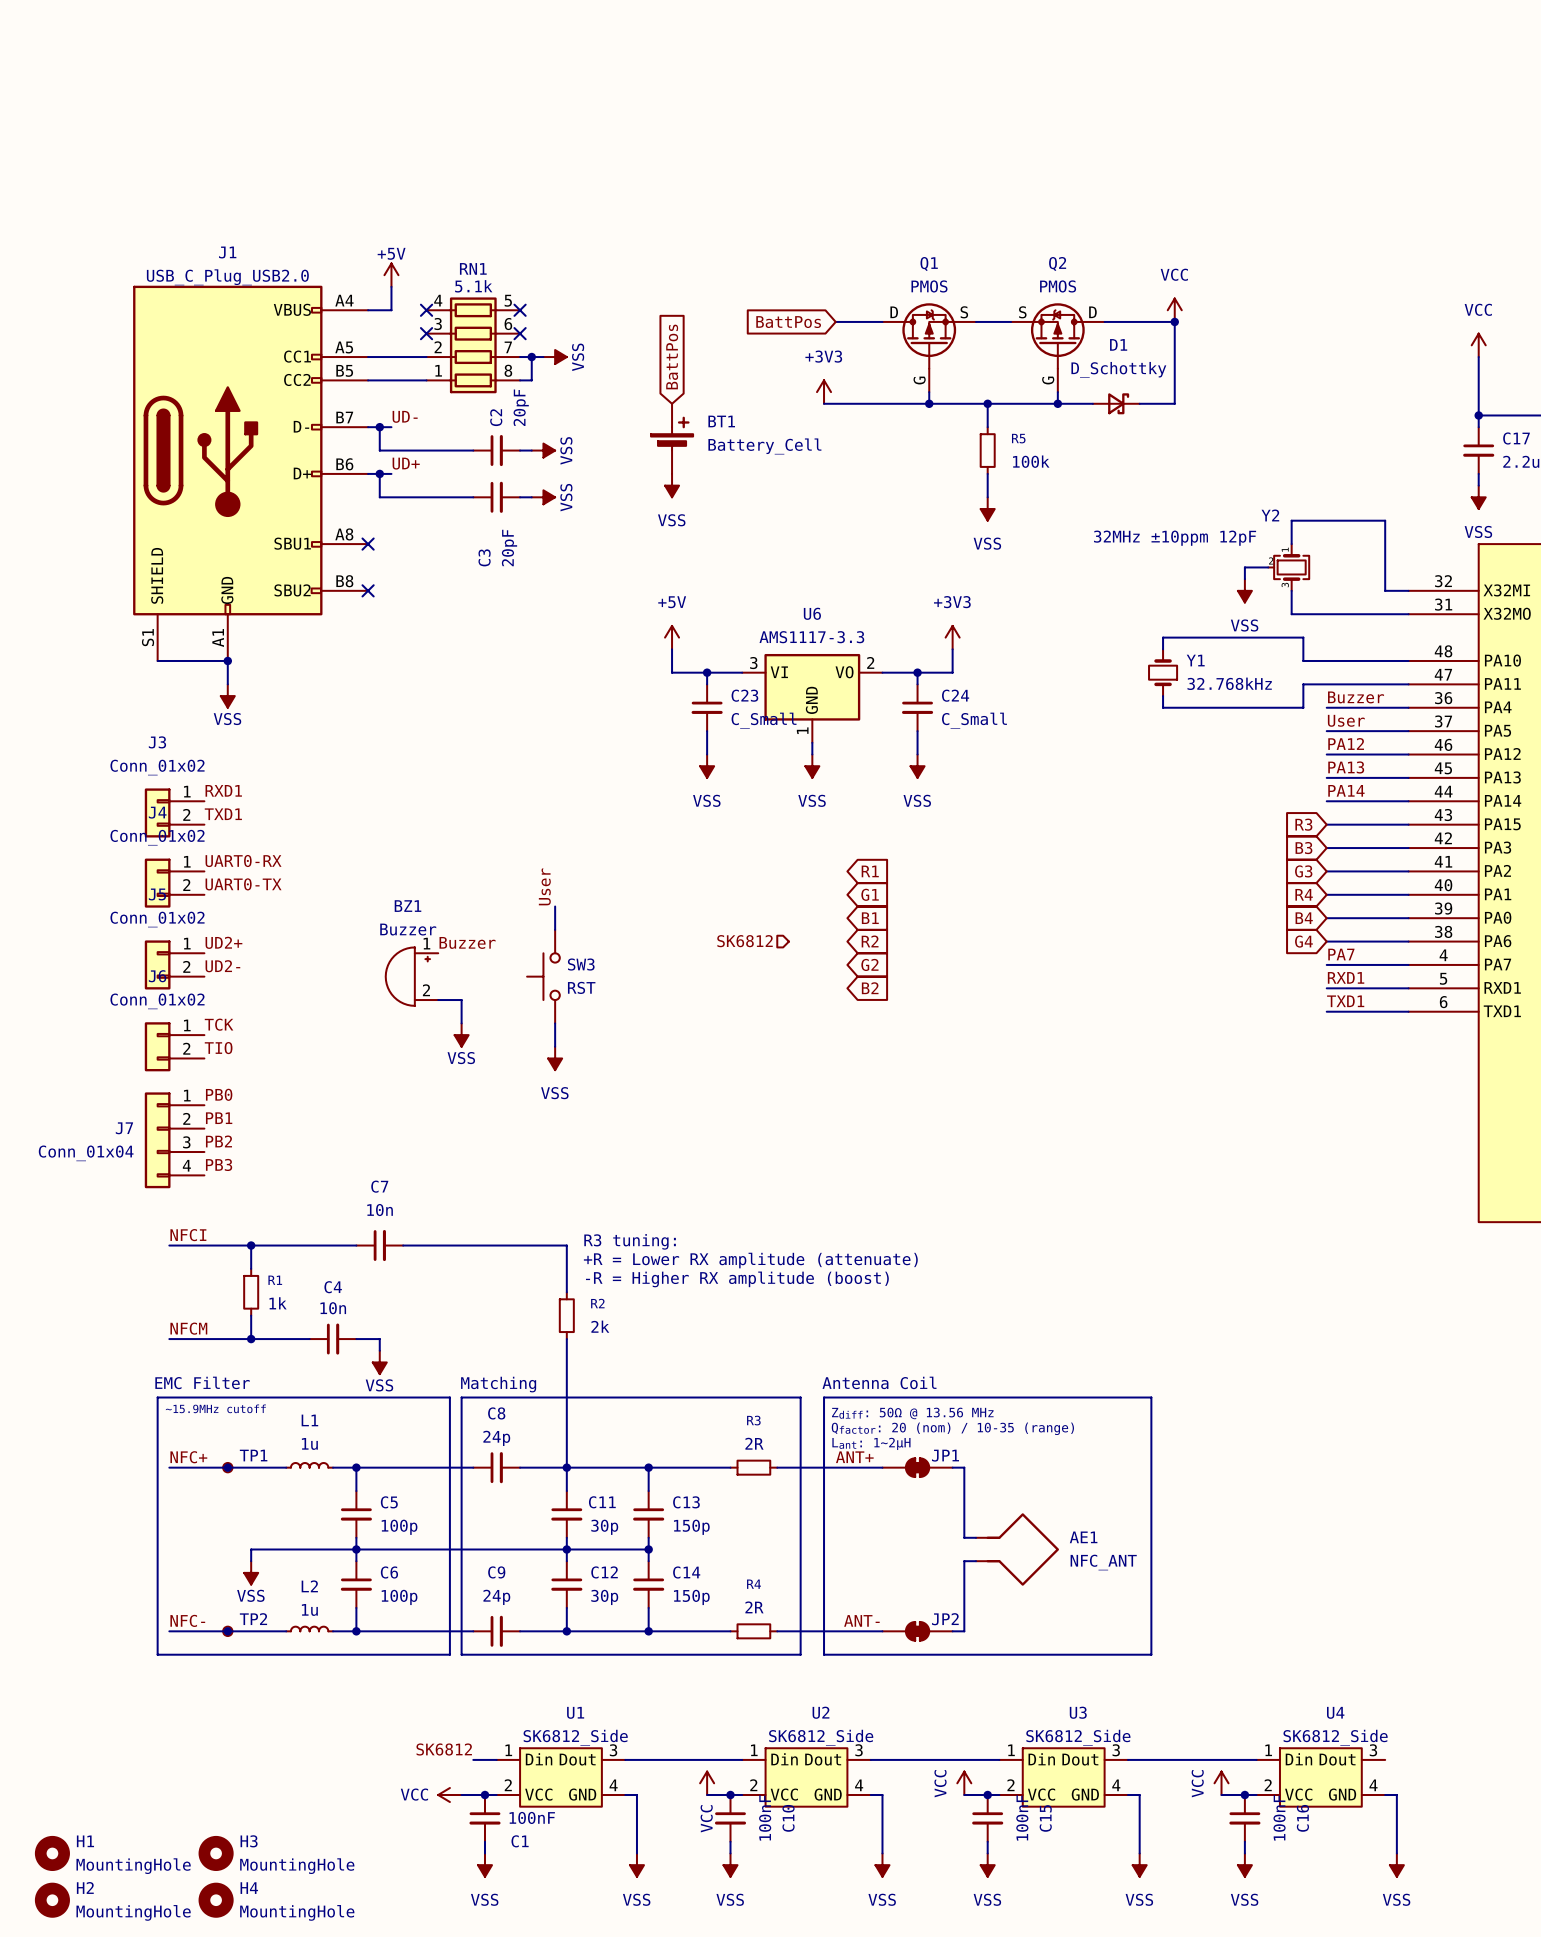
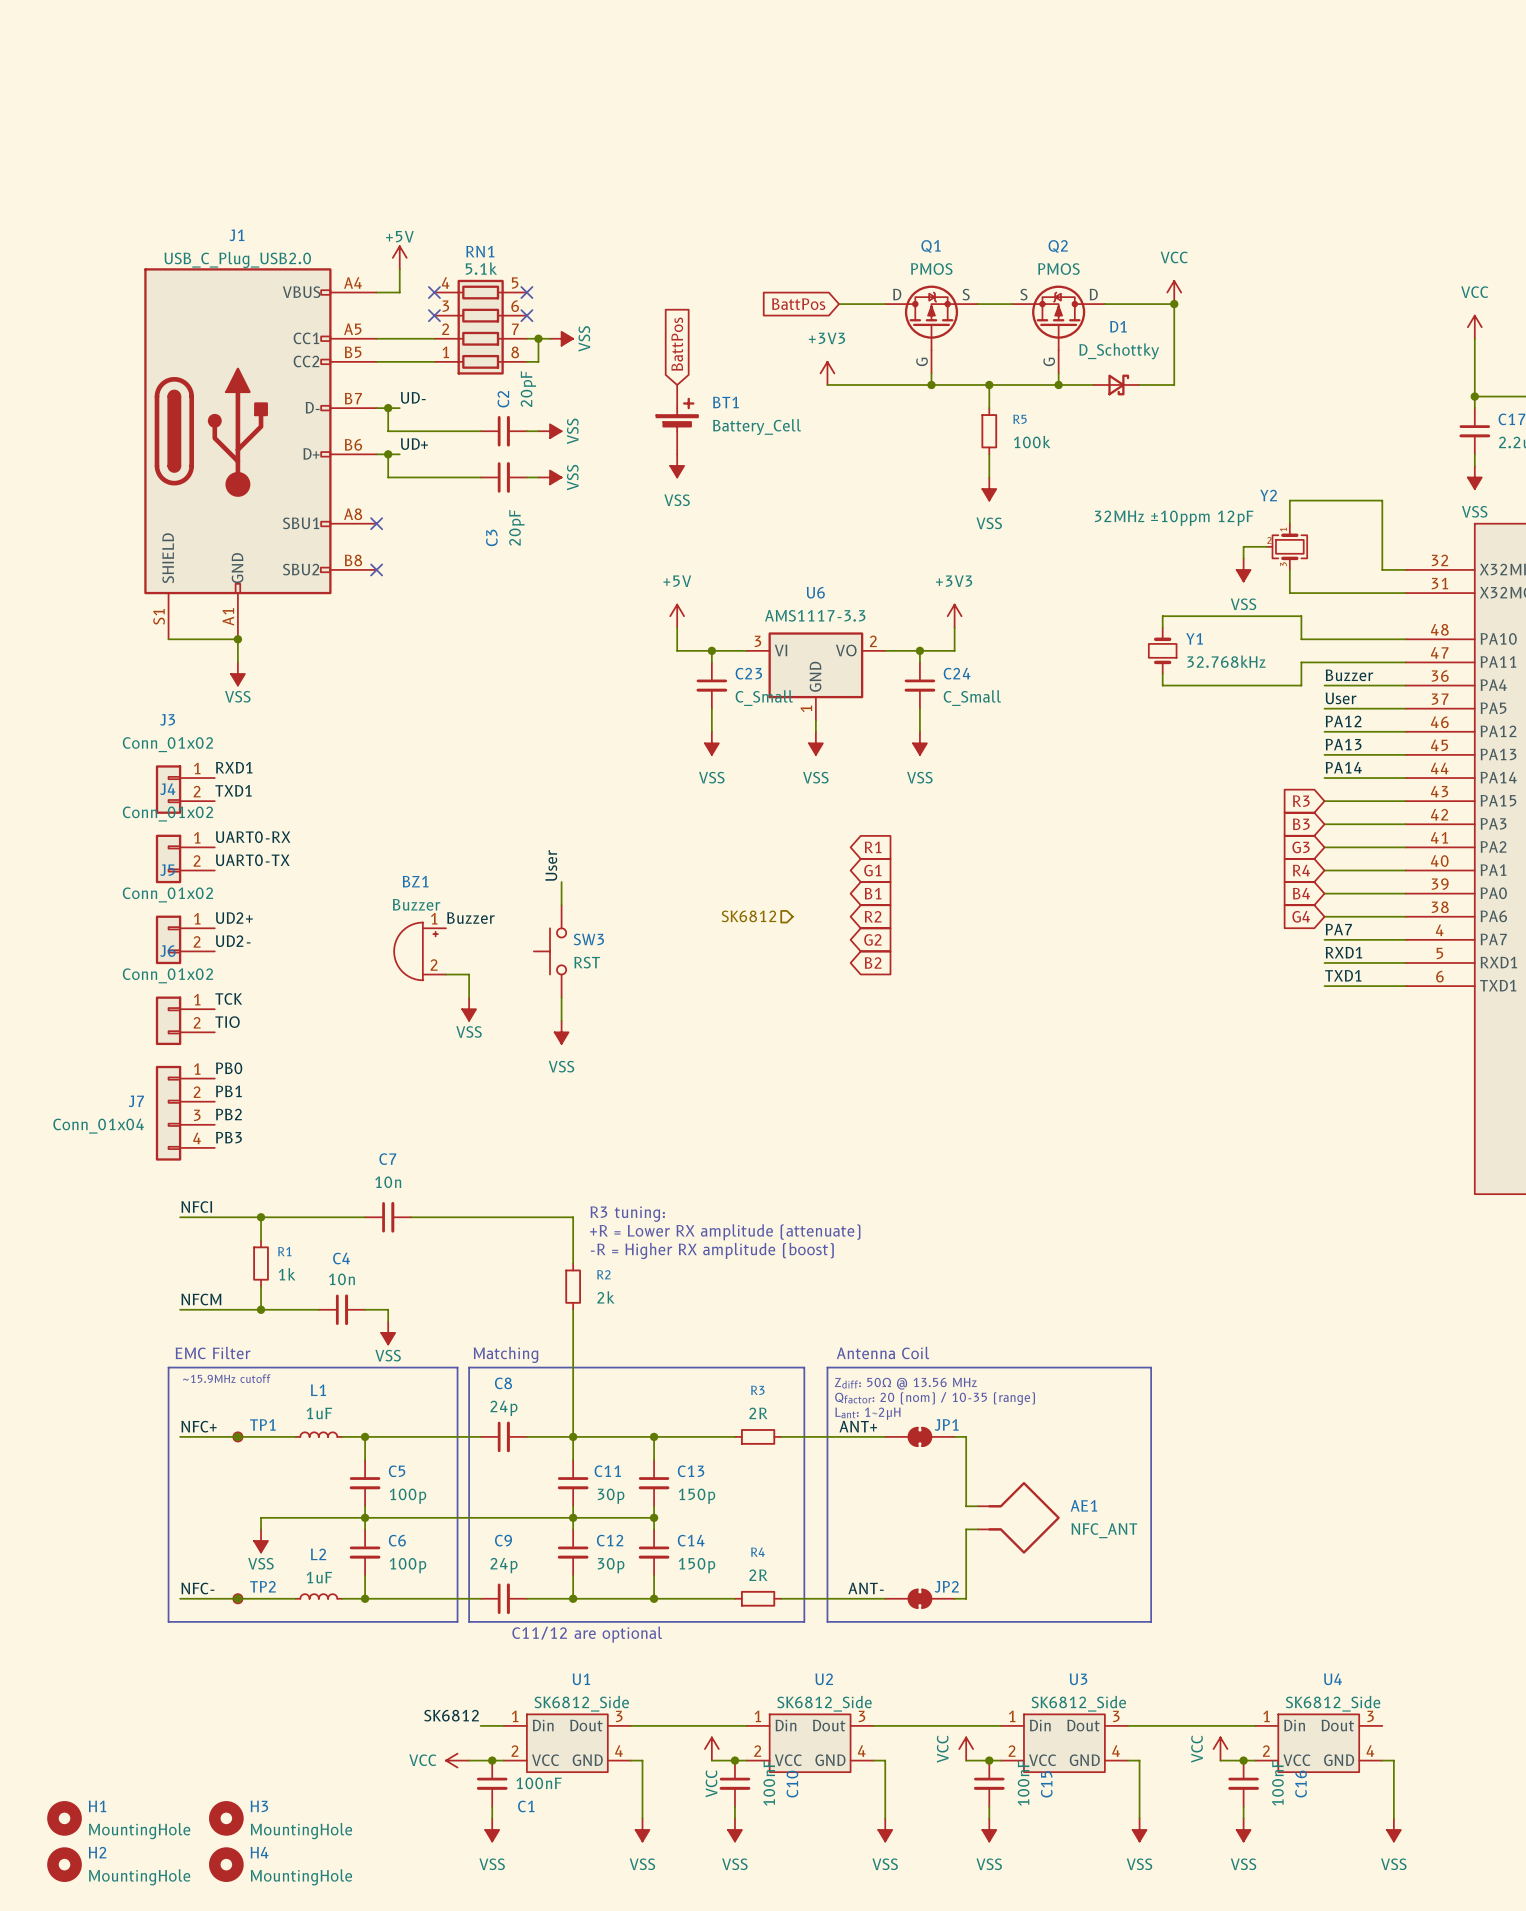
L1 value: 1u (309, 1443) -> 1uF (319, 1413)
L2 value: 1u (309, 1609) -> 1uF (319, 1577)
text: none -> C11/12 are optional (587, 1634)

